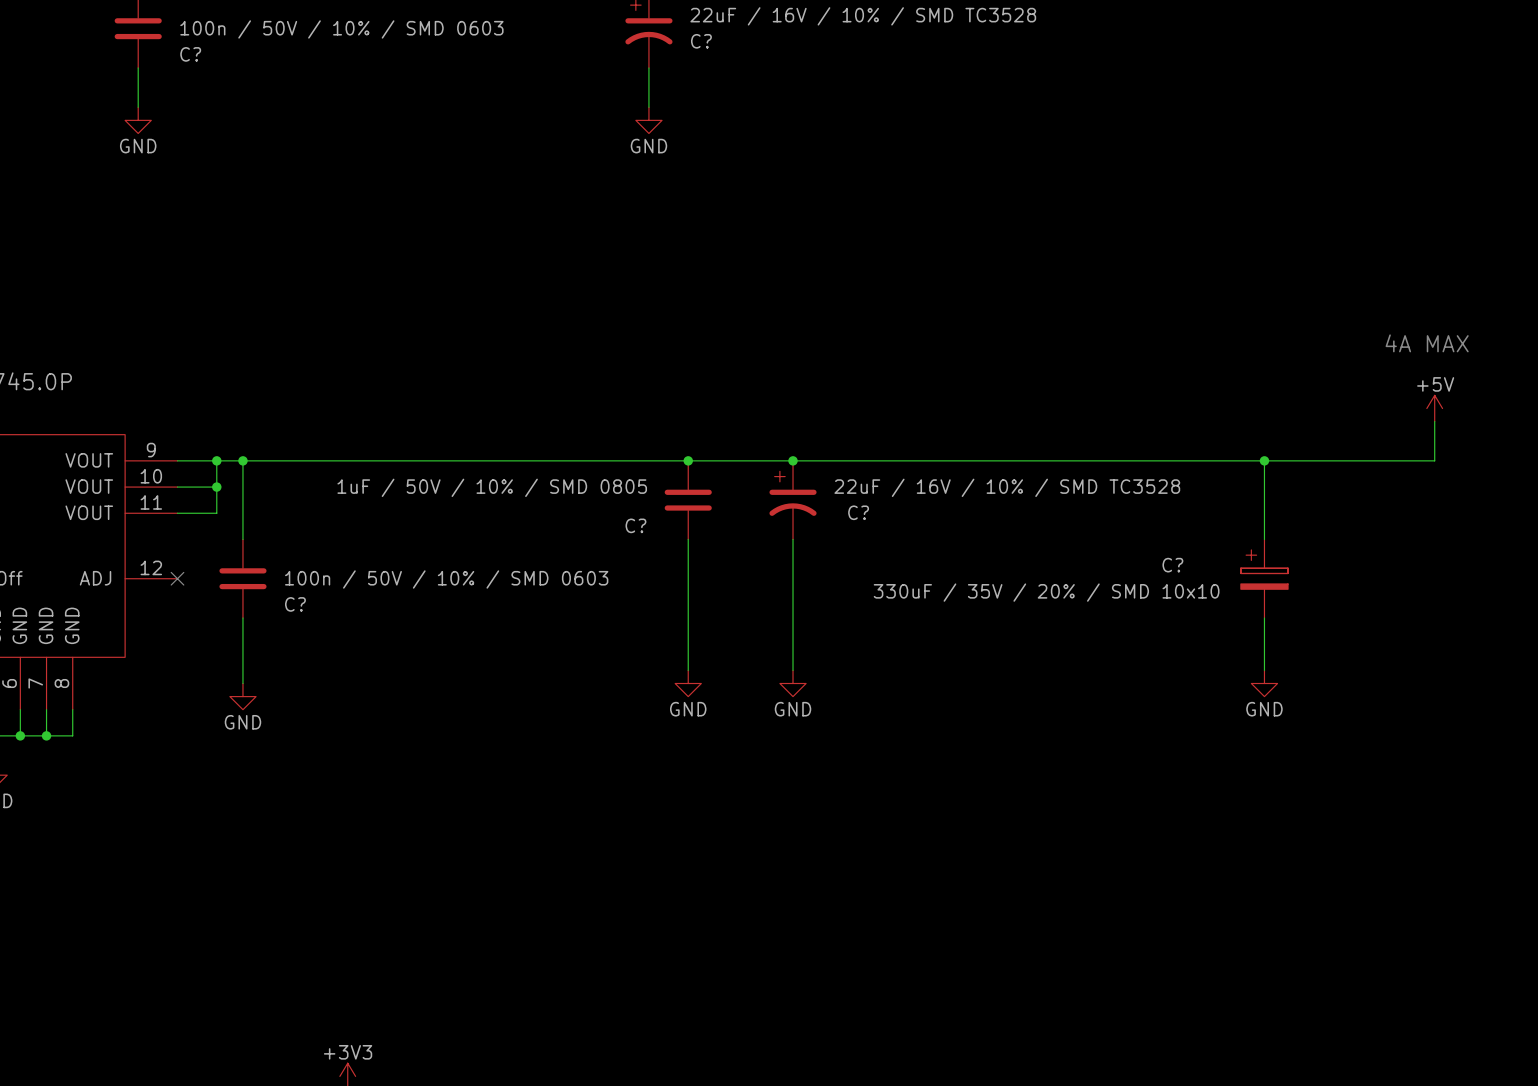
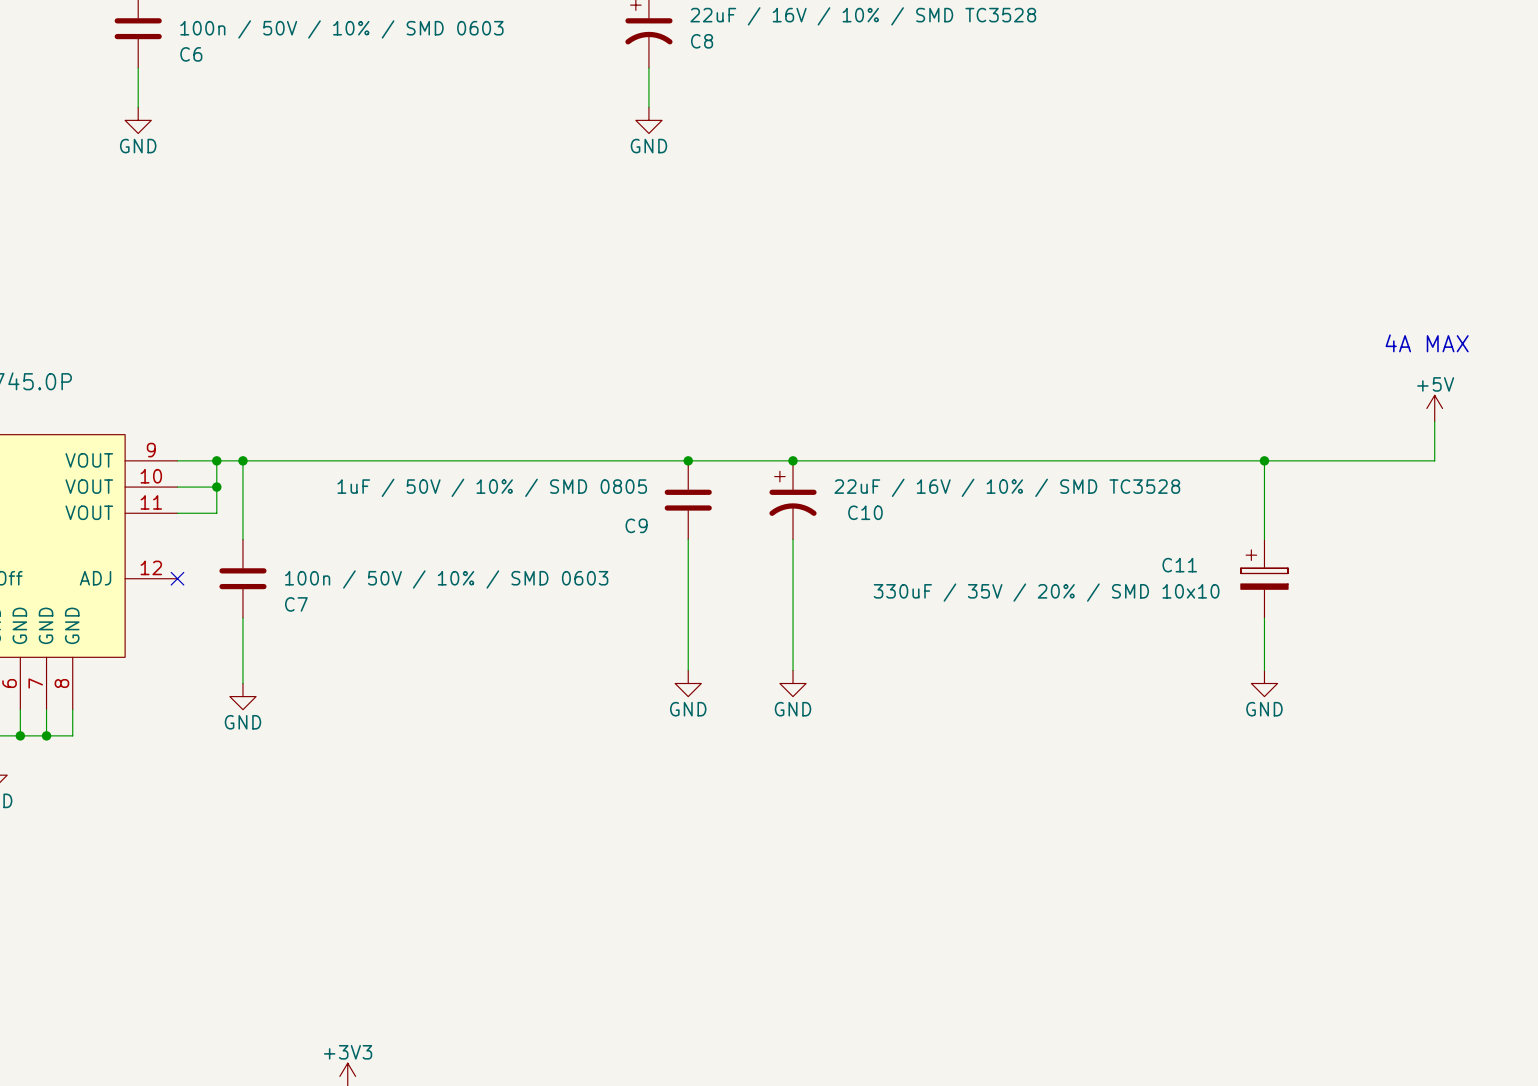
C? name: C? (701, 41) -> C8 (702, 41)
C? name: C? (190, 54) -> C6 (191, 54)
C? name: C? (858, 512) -> C10 (865, 512)
C? name: C? (635, 525) -> C9 (636, 525)
C? name: C? (1172, 565) -> C11 (1179, 565)
C? name: C? (295, 604) -> C7 (296, 604)

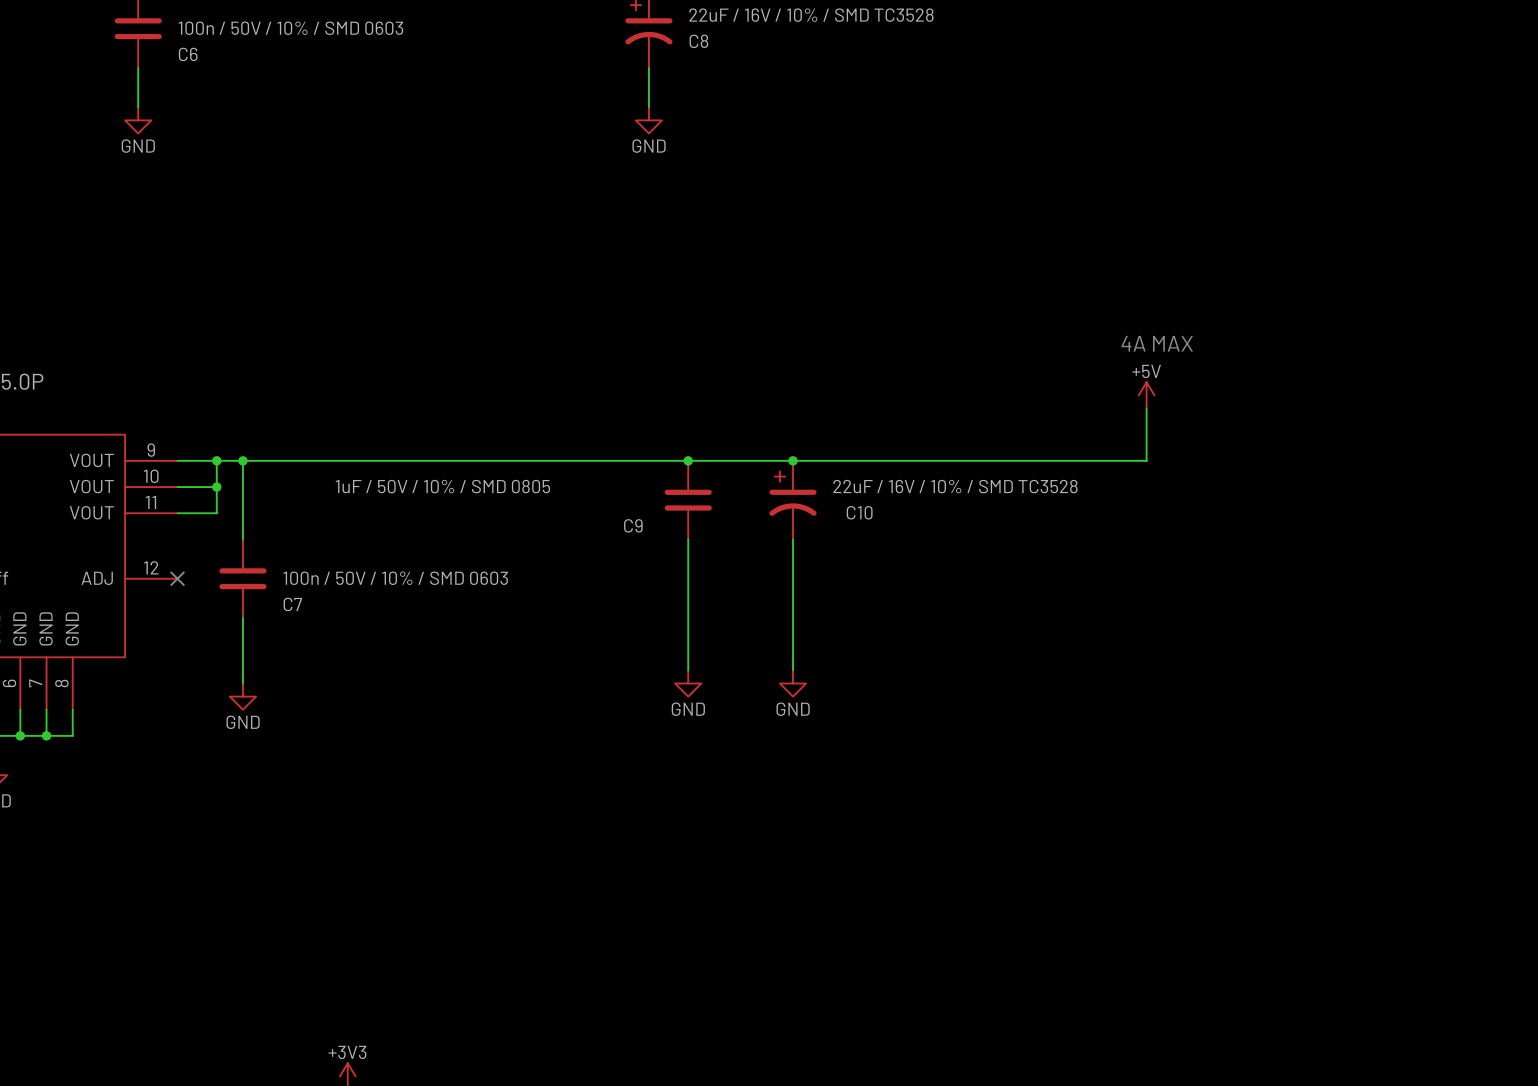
text: none -> 4A MAX (1157, 343)
text: 4A MAX (1427, 343) -> none
power symbol: none -> +5V (1146, 395)
power symbol: +5V (1434, 408) -> none
wire: (1434, 421) (1434, 460) (1146, 460) -> (1146, 408) (1146, 460)
wire: (1264, 460) (1264, 539) -> none
junction: (1264, 460) -> none
C11: 330uF / 35V / 20% / SMD 10x10 (1264, 578) -> none
wire: (1264, 618) (1264, 670) -> none
power symbol: GND (1264, 683) -> none

